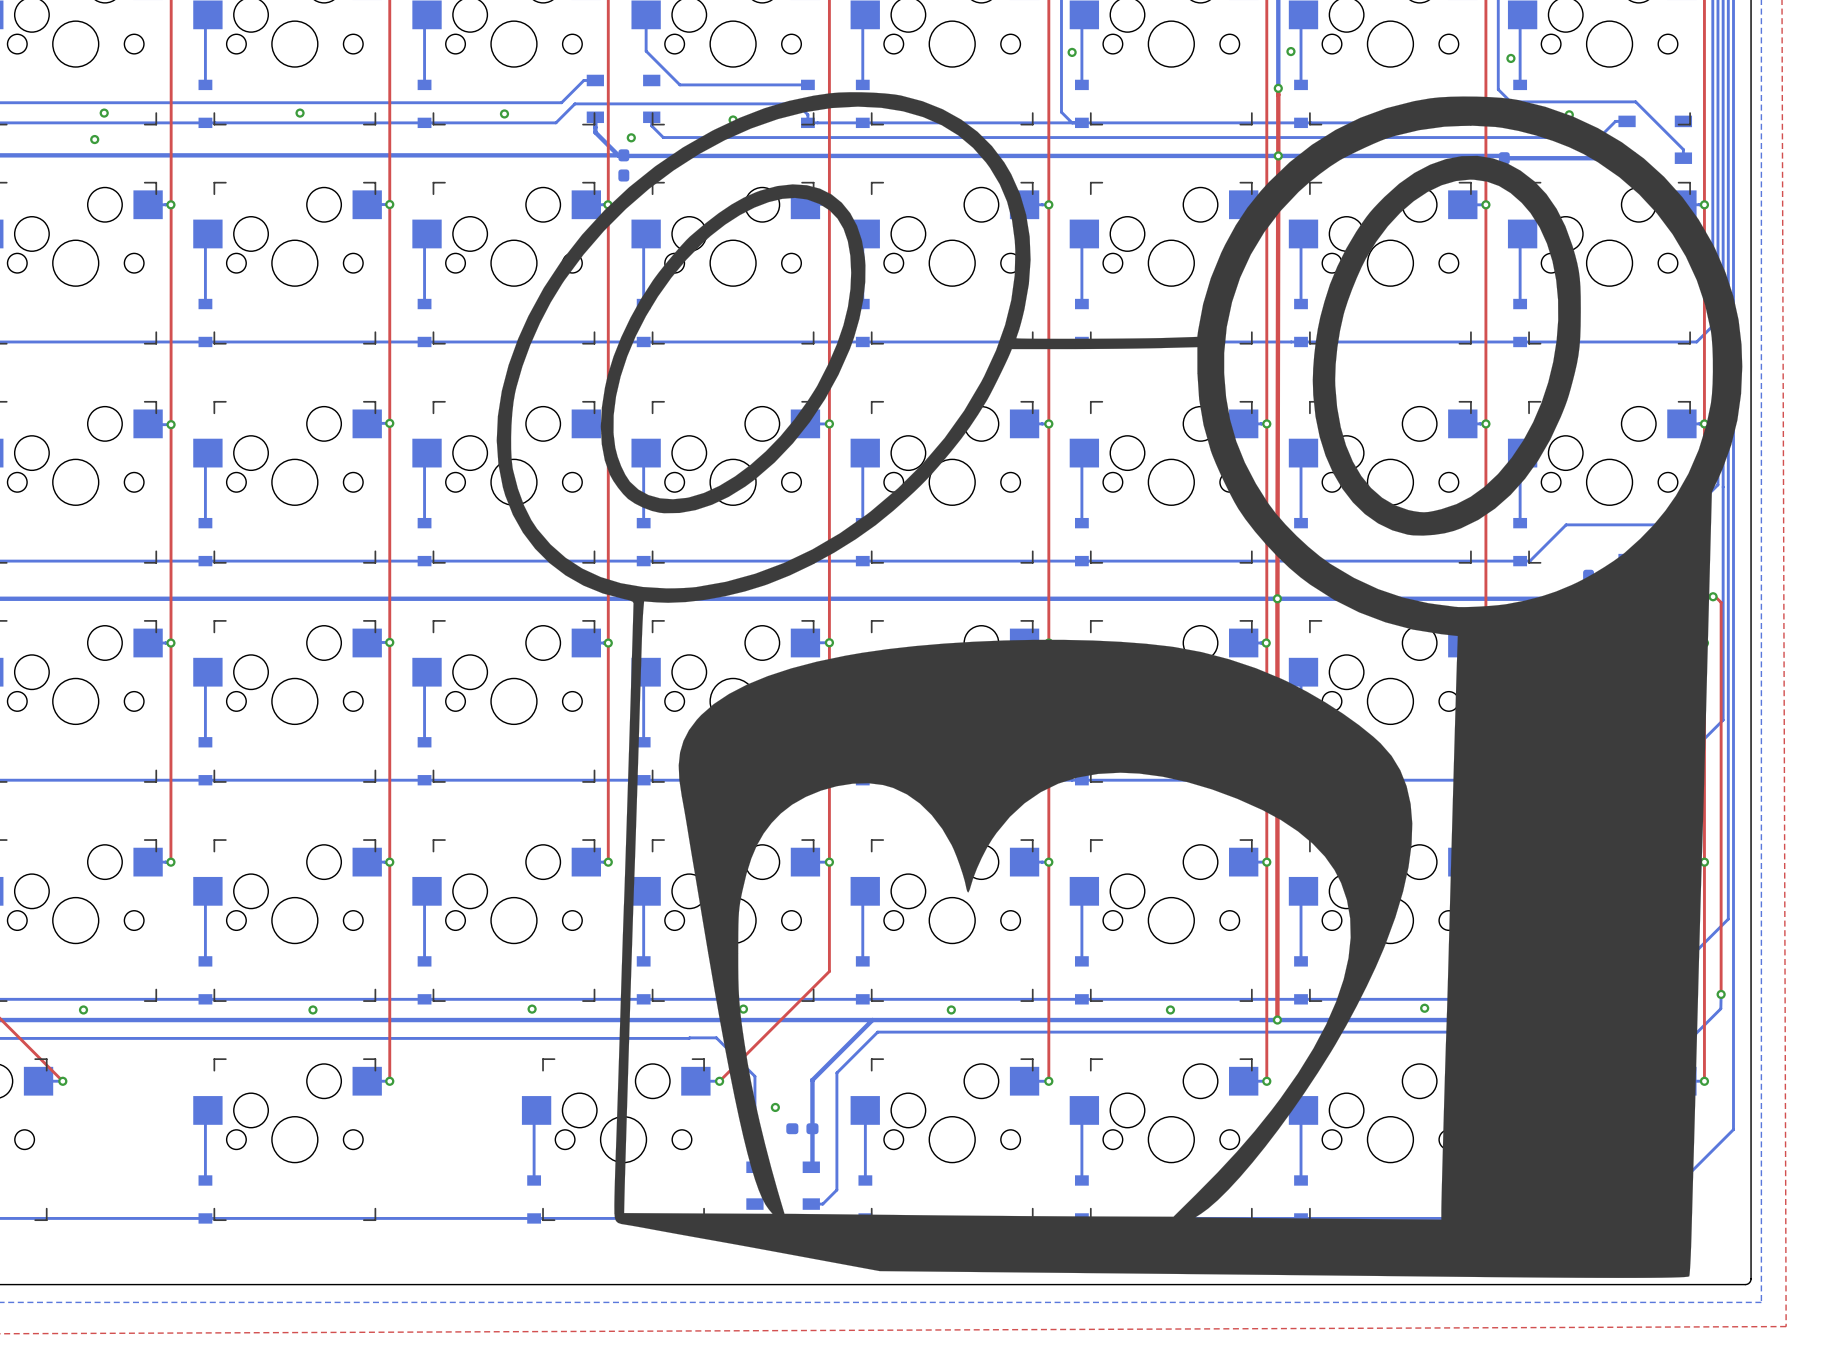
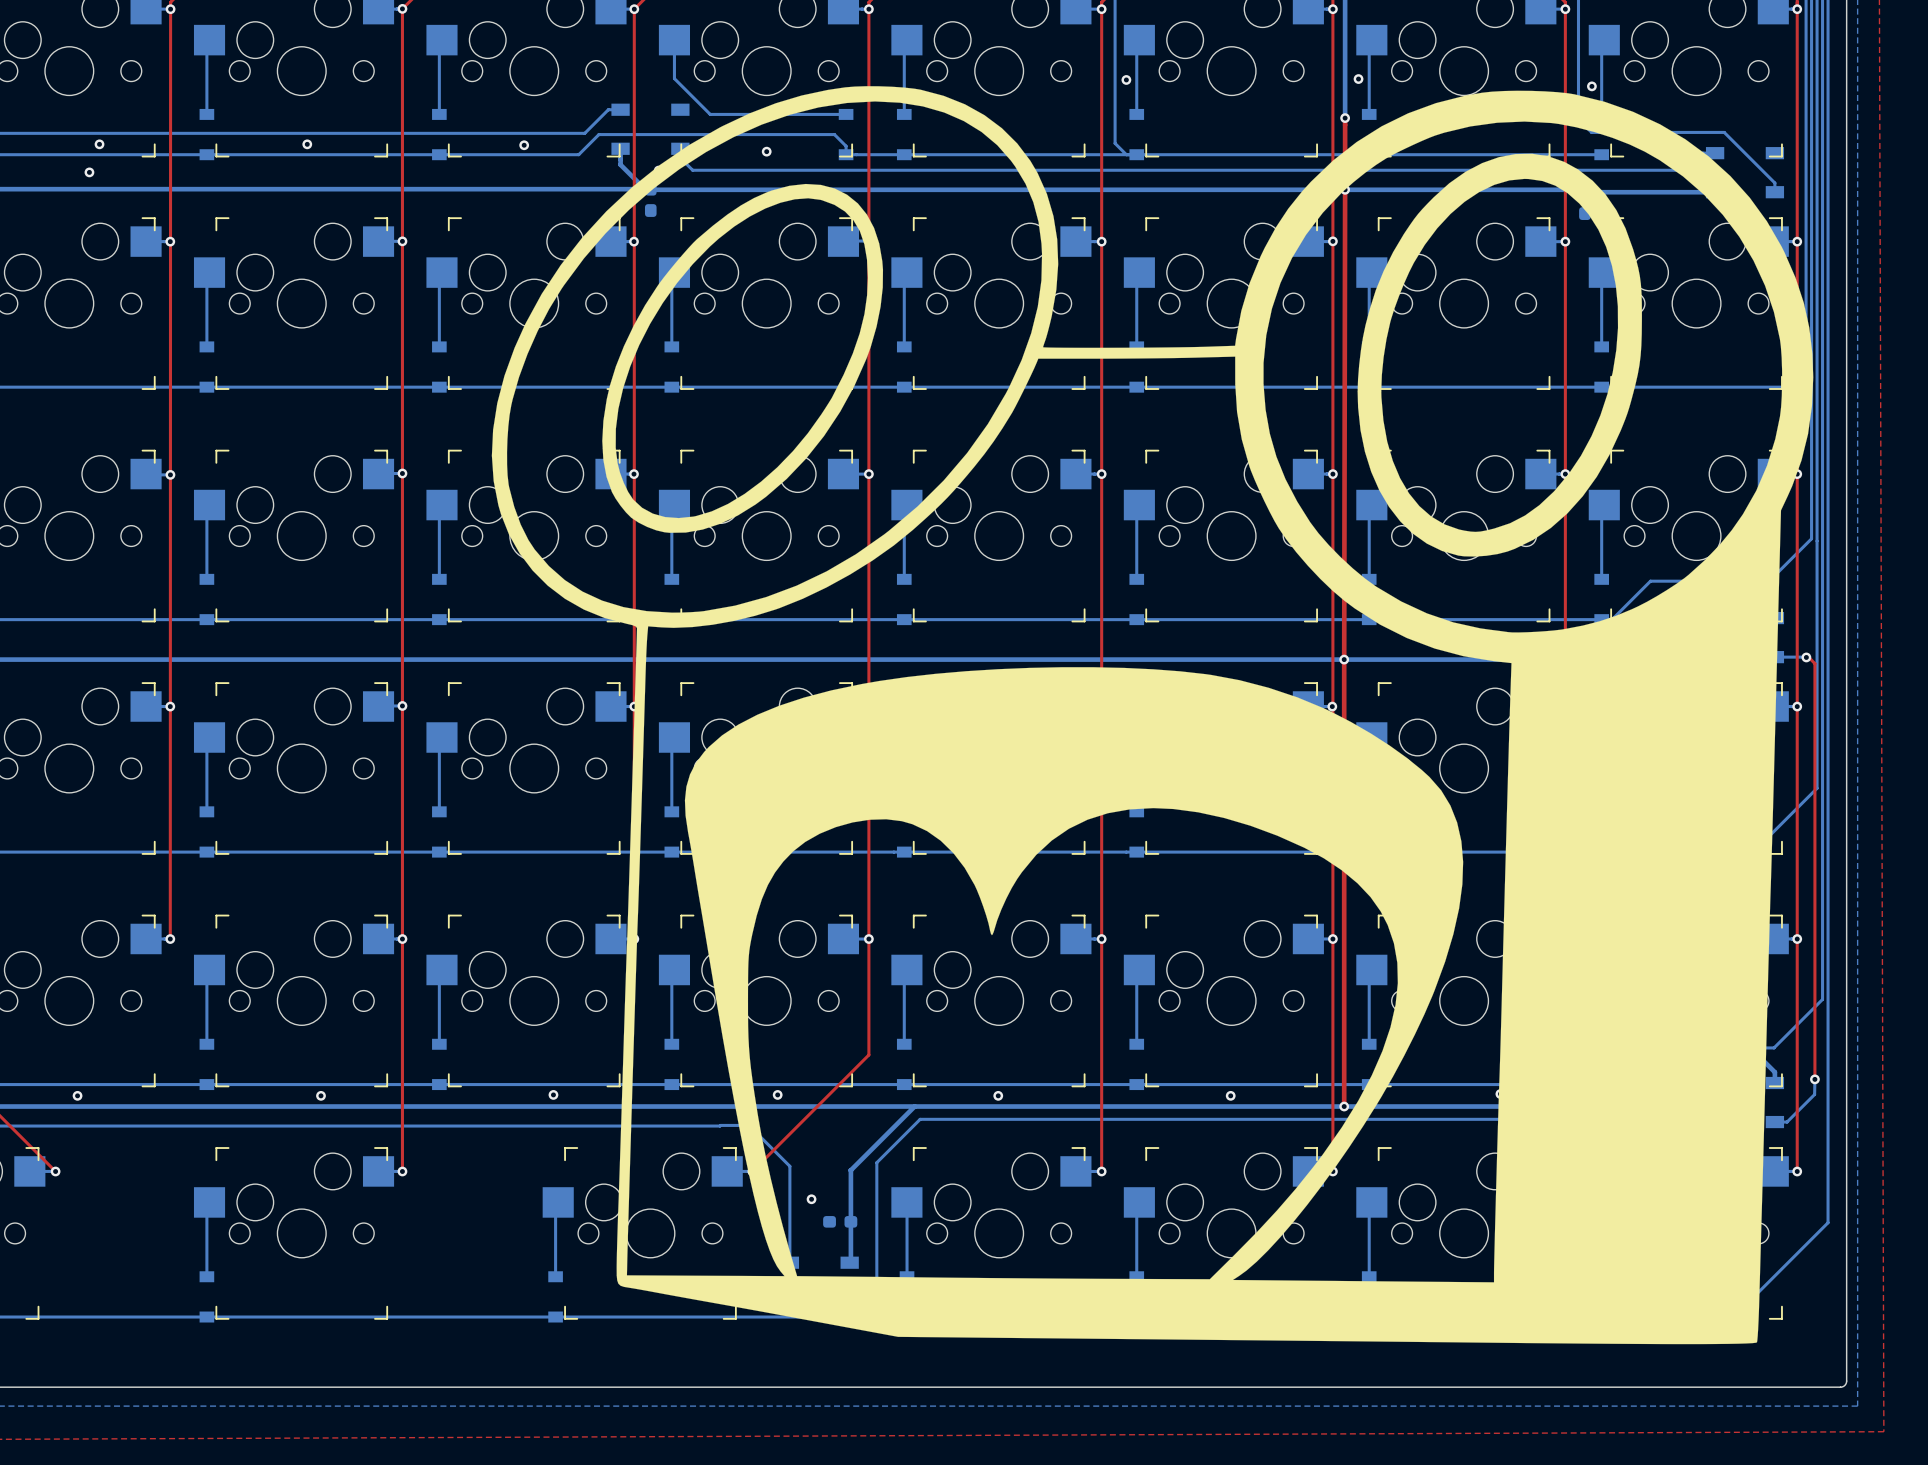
drawing position: (1119, 685) -> (1152, 715)

